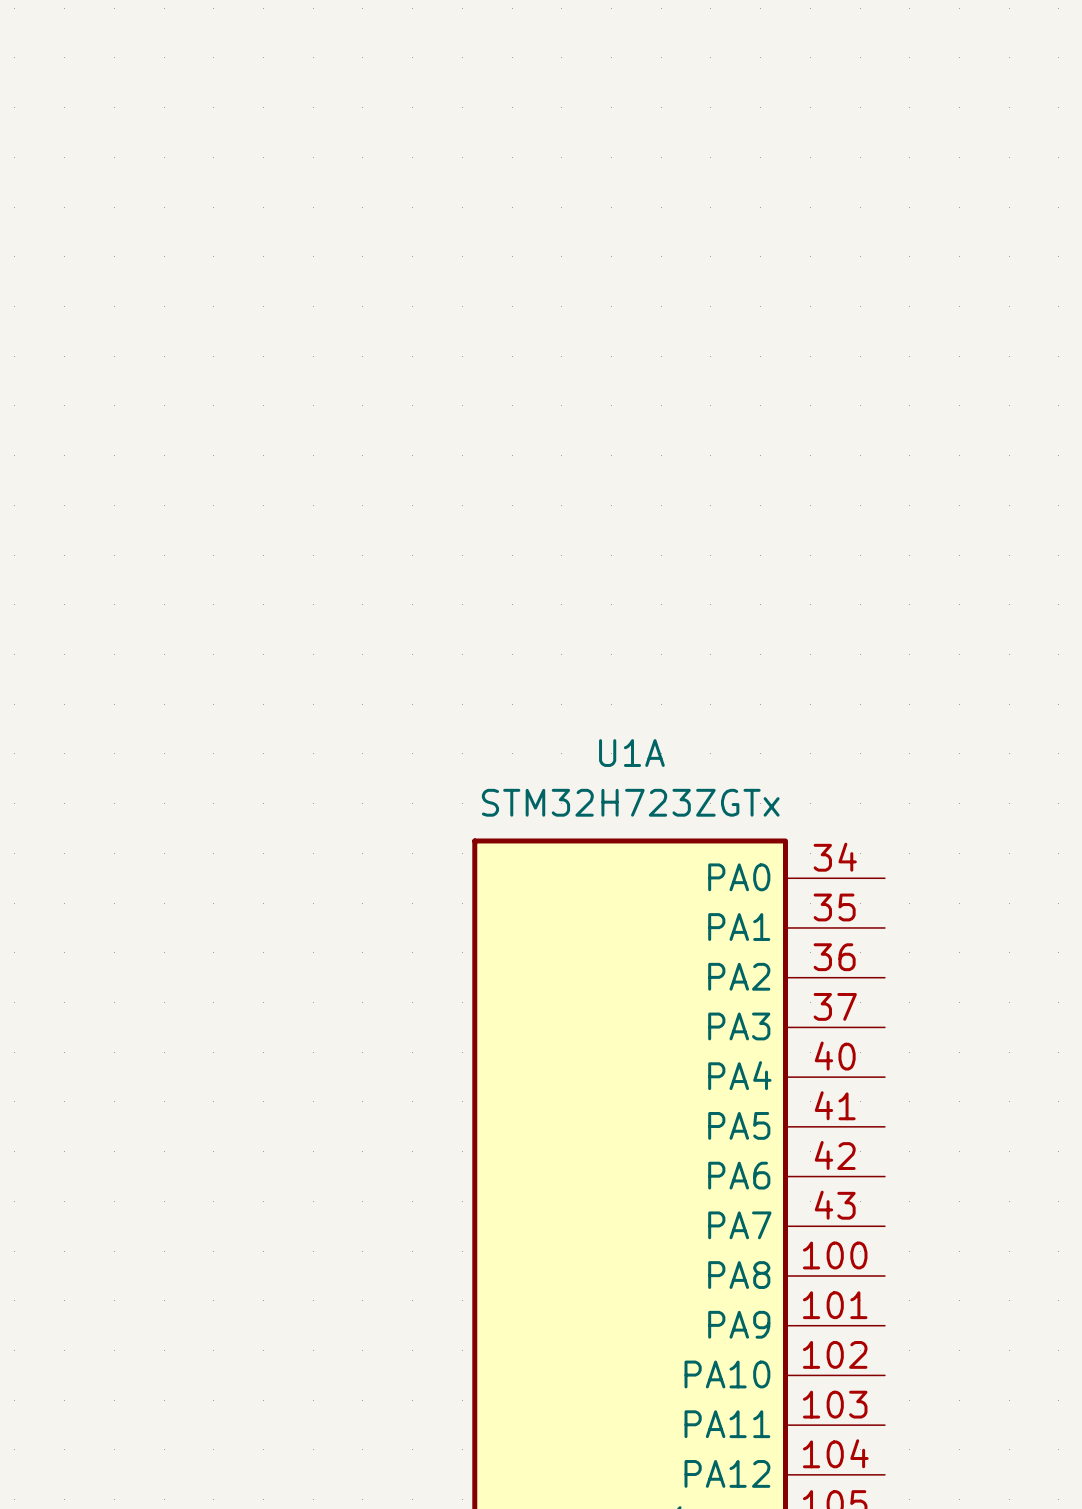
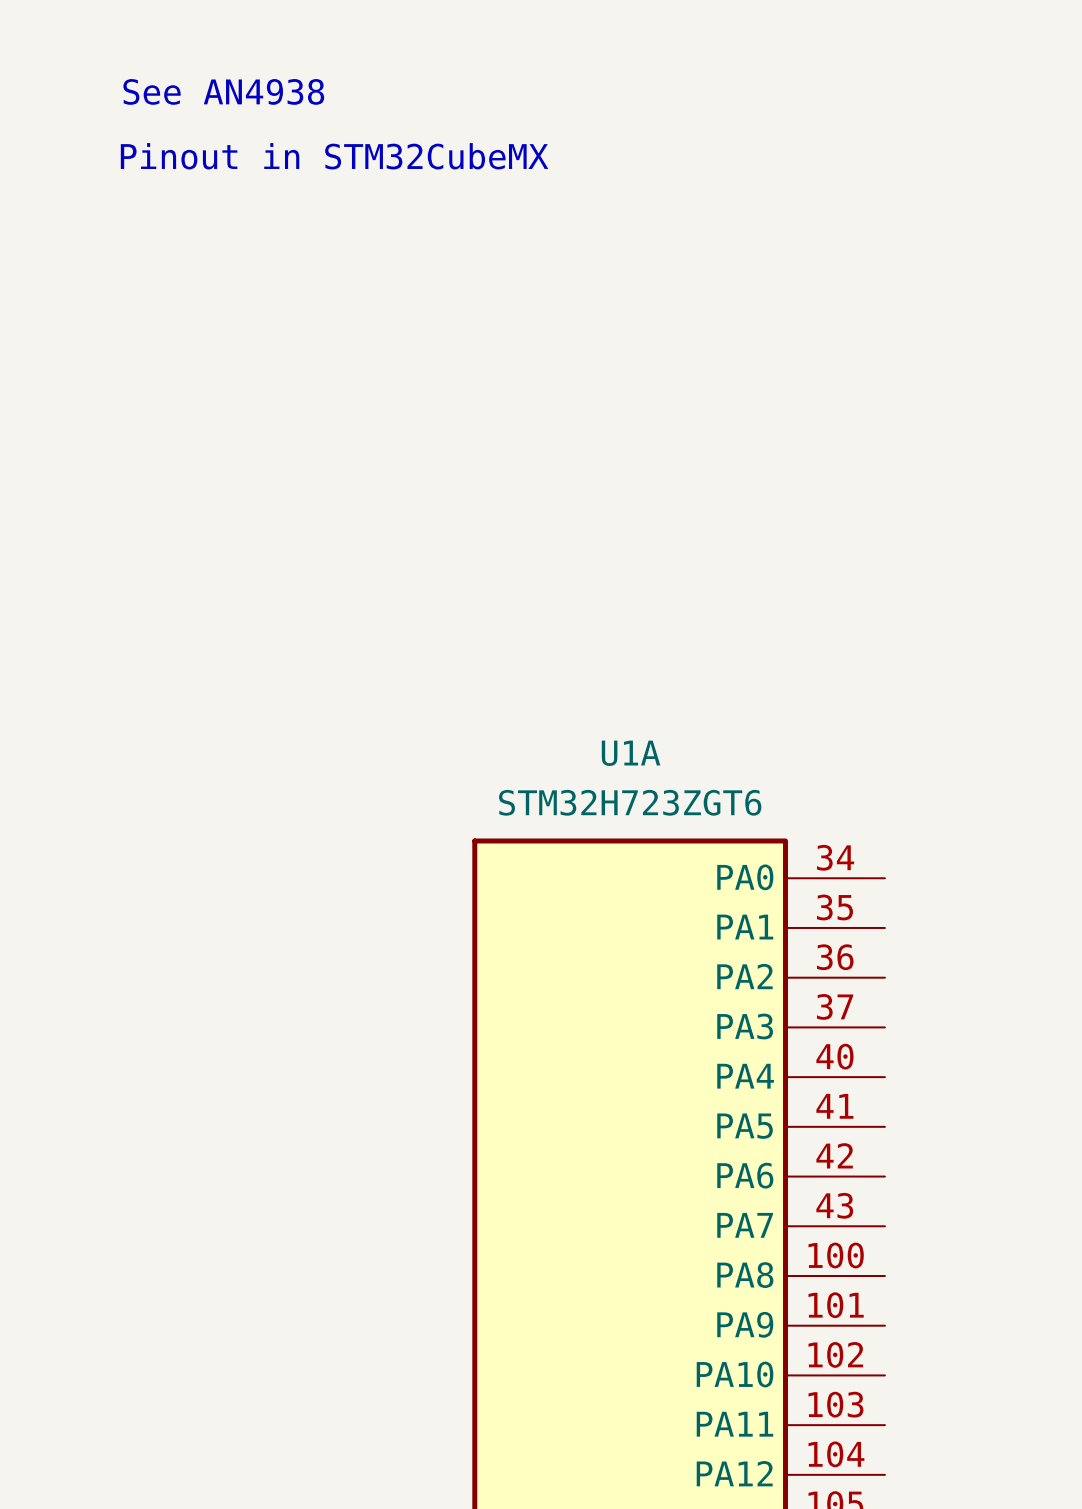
text: none -> See AN4938 (223, 91)
text: none -> Pinout in STM32CubeMX (334, 156)
U1A value: STM32H723ZGTx (630, 802) -> STM32H723ZGT6 (630, 802)

